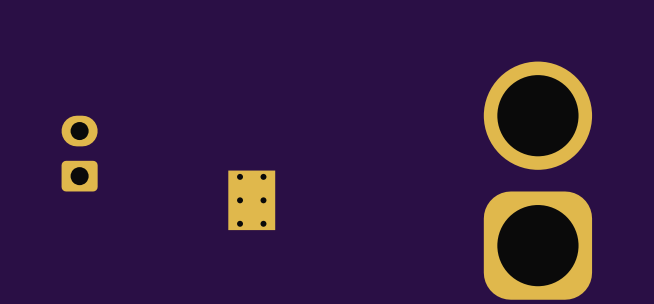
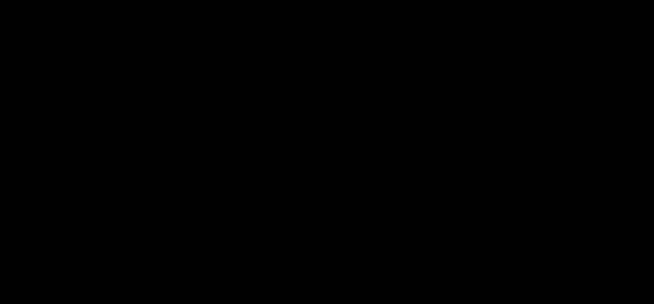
part: (79, 153) -> none
part: (537, 180) -> none
part: (251, 200) -> none

